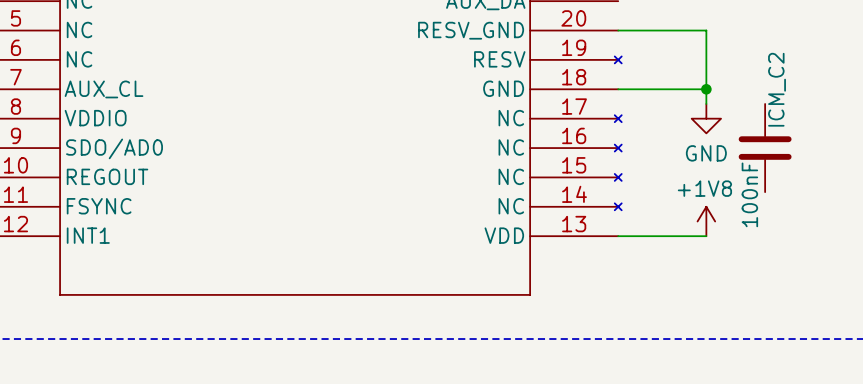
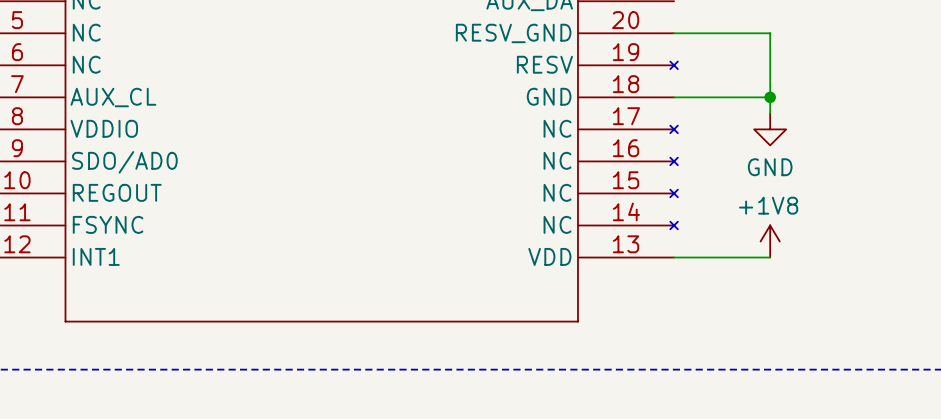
ICM_C2: 100nF (765, 148) -> none

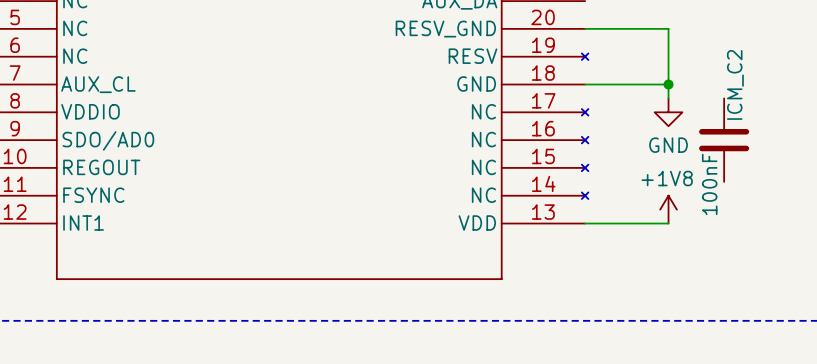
ICM_C2: none -> 100nF (724, 140)

